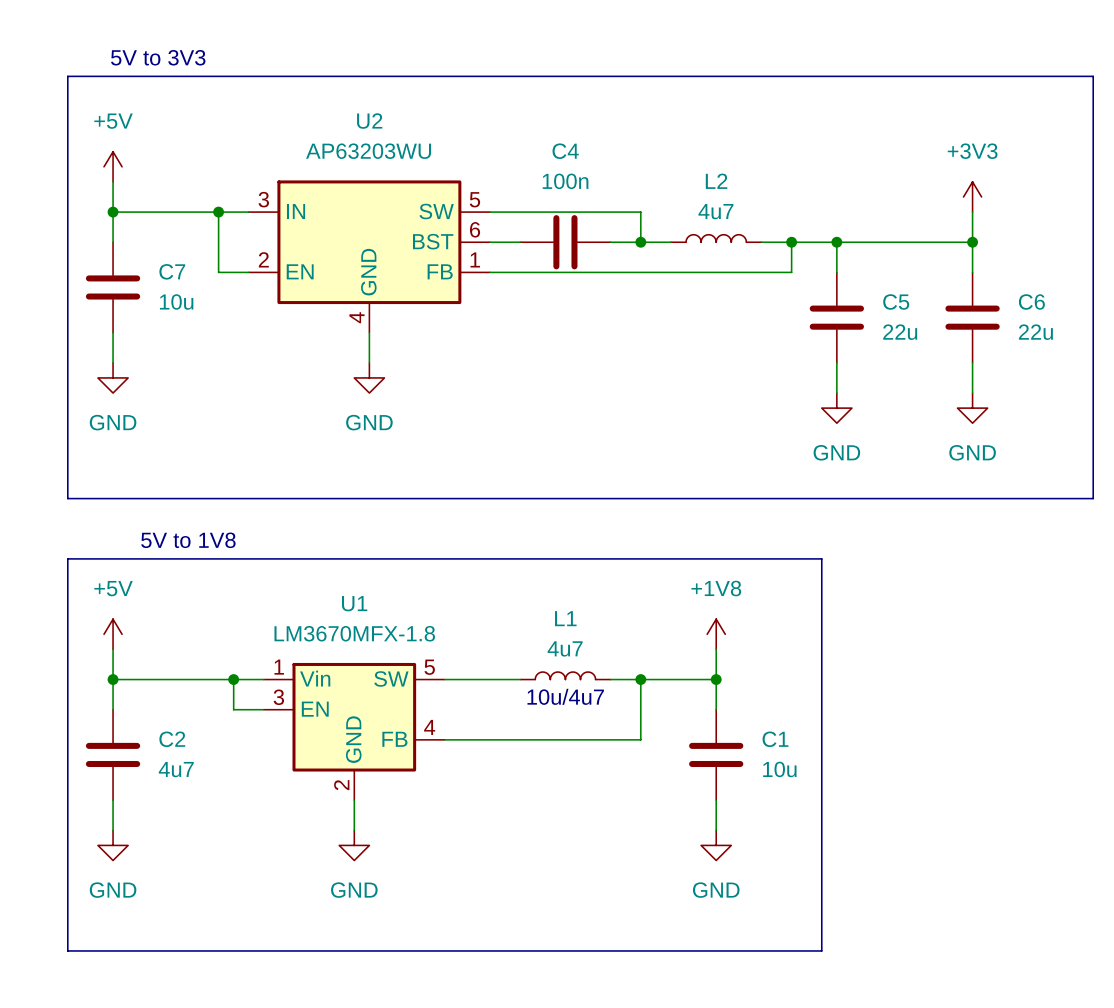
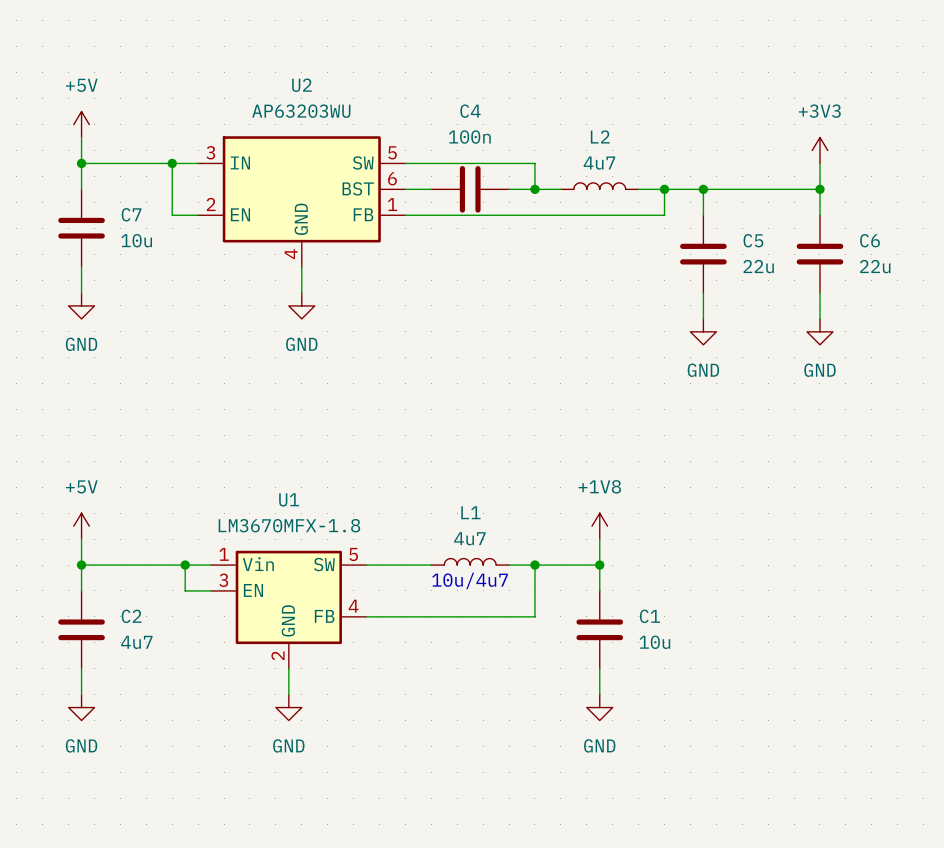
text: 5V to 3V3 (158, 57) -> none
line: (67, 76) (67, 498) (1093, 498) (1093, 76) (67, 76) -> none
text: 5V to 1V8 (188, 540) -> none
line: (67, 558) (821, 558) (821, 950) (67, 950) (67, 558) -> none

